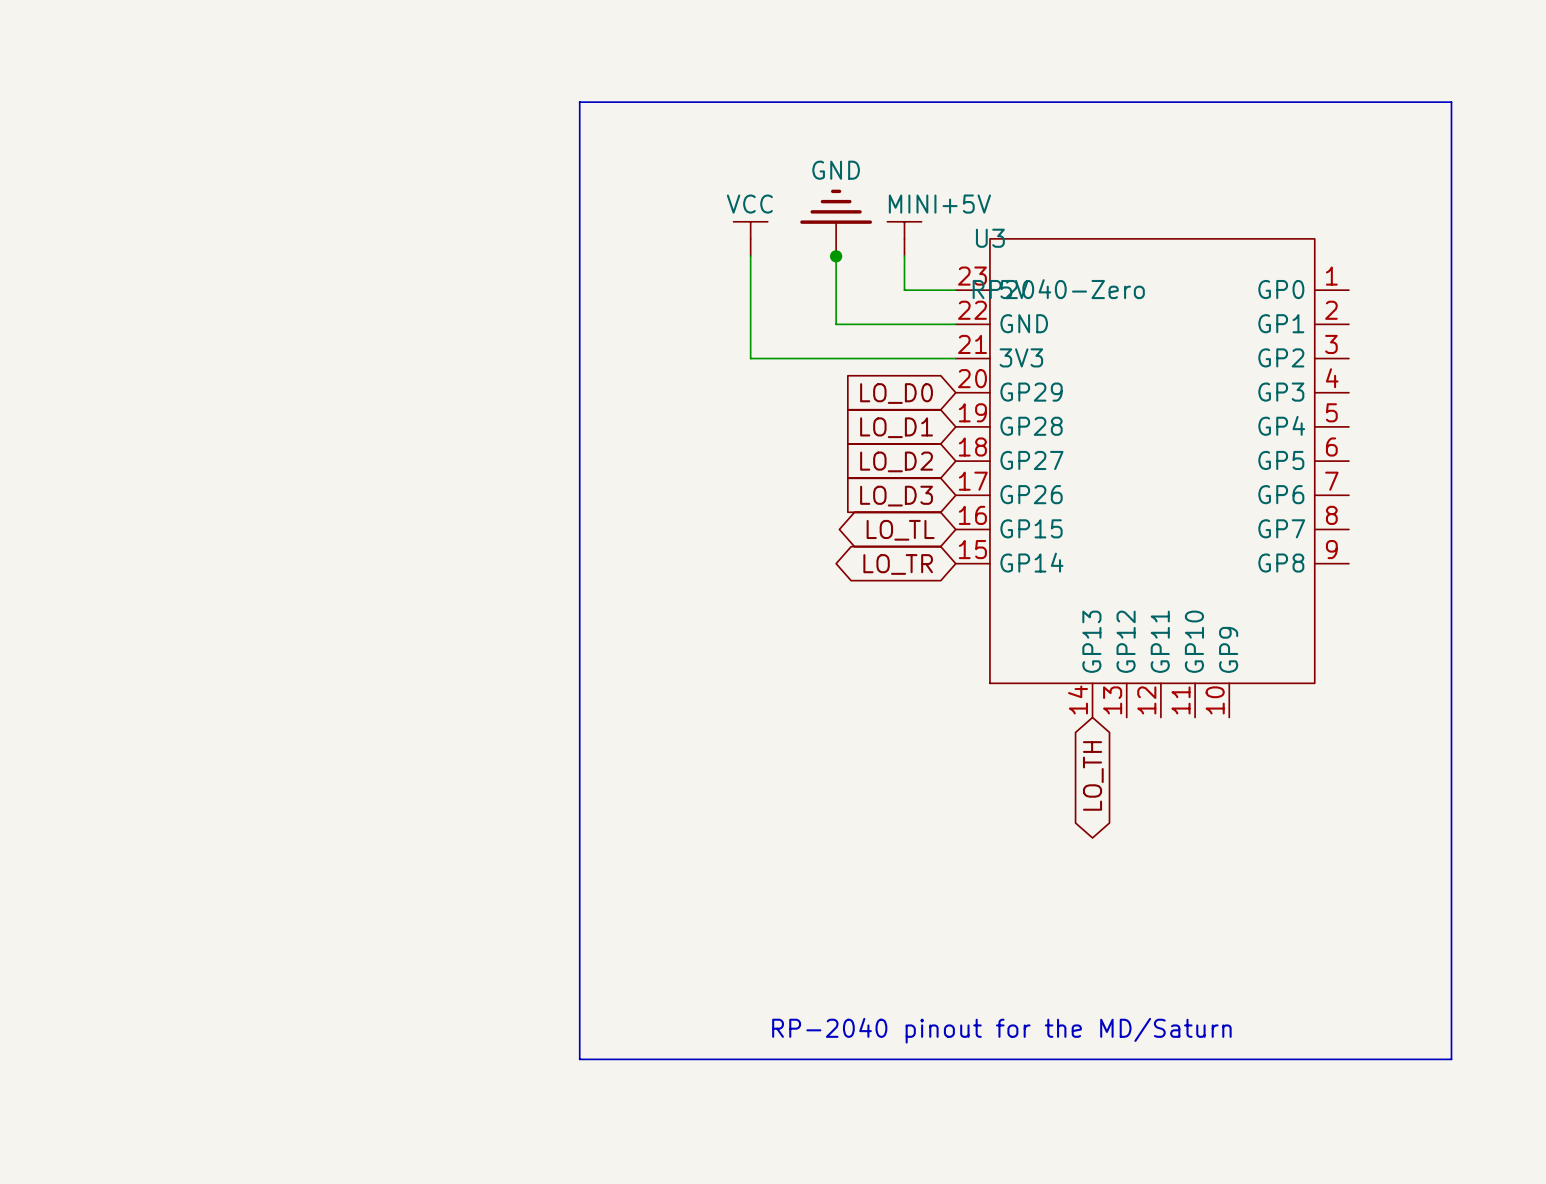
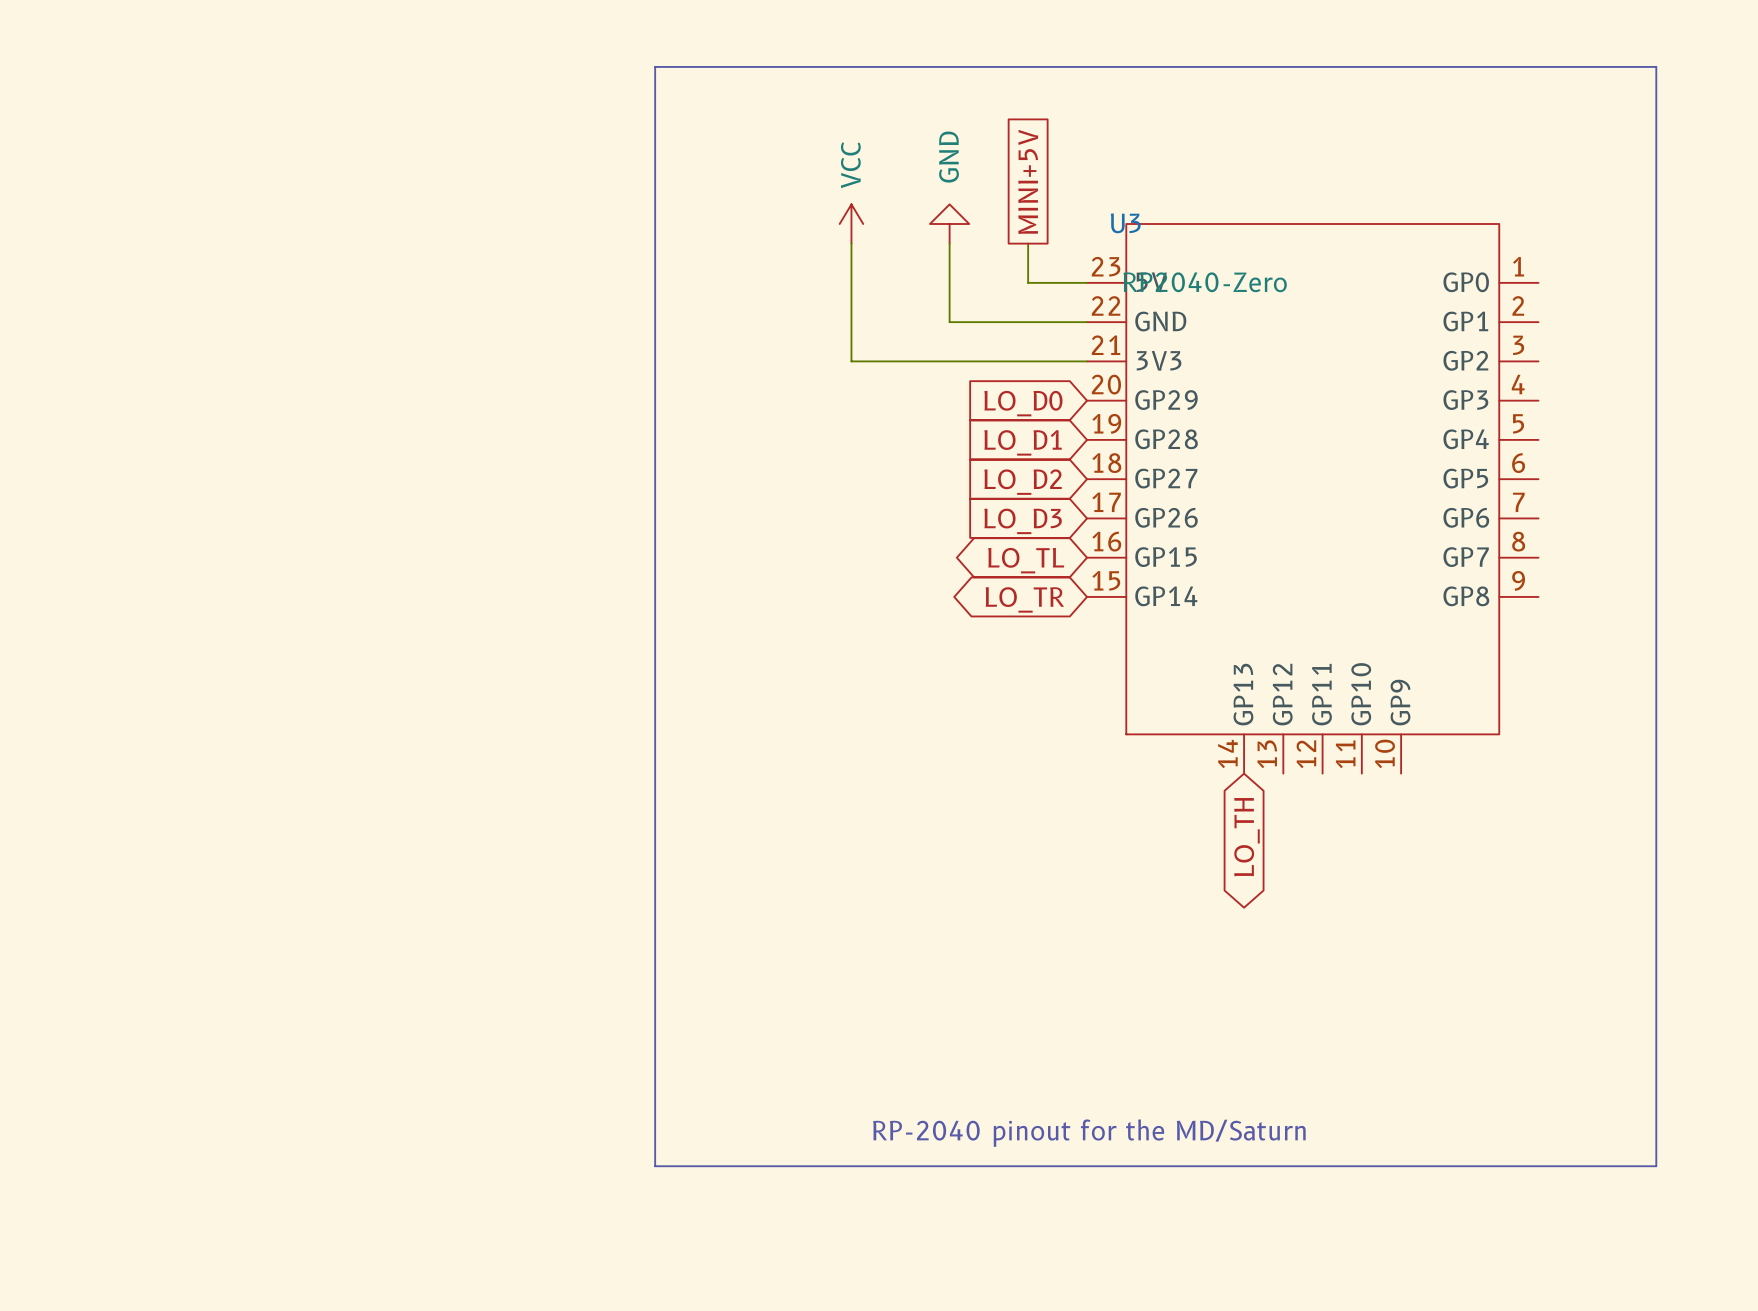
global label: none -> MINI+5V (1028, 181)
power symbol shape: [733, 221, 768, 256] -> [839, 204, 864, 244]
power symbol: GND (836, 222) -> none
power symbol: none -> GND (949, 223)
power symbol: MINI+5V (904, 238) -> none
junction: (836, 256) -> none

